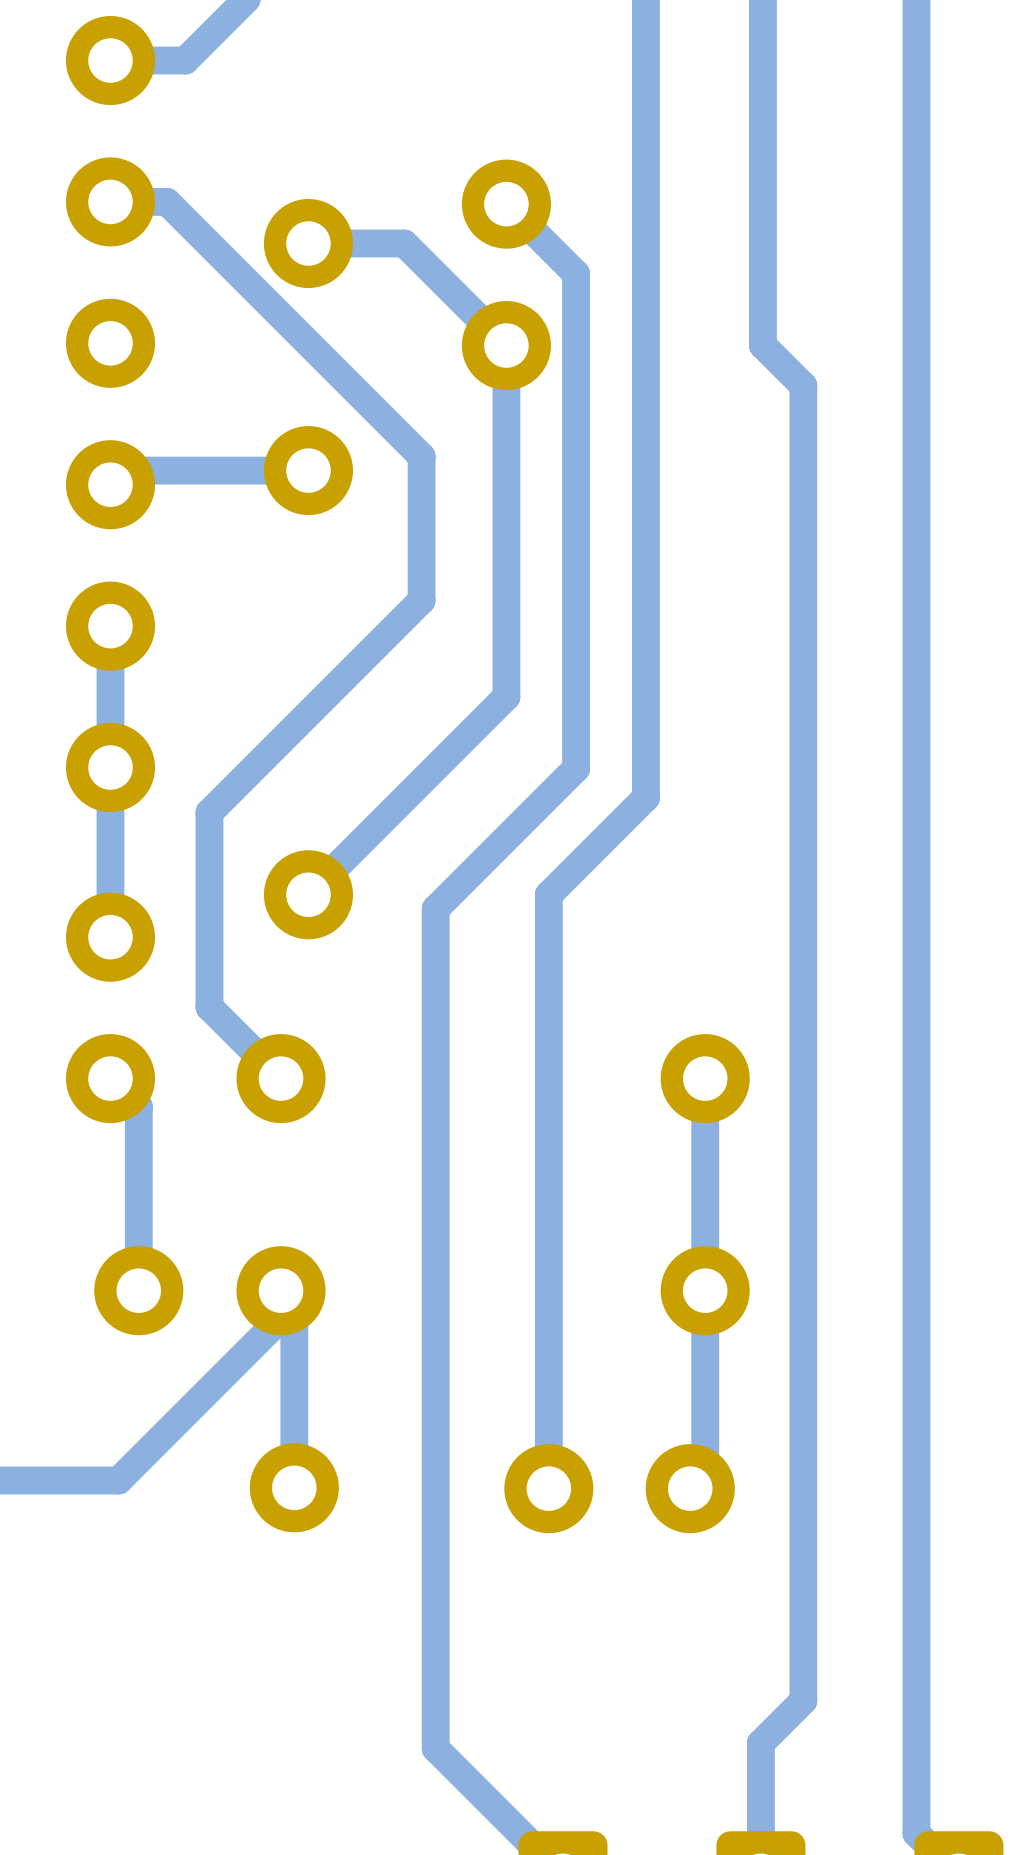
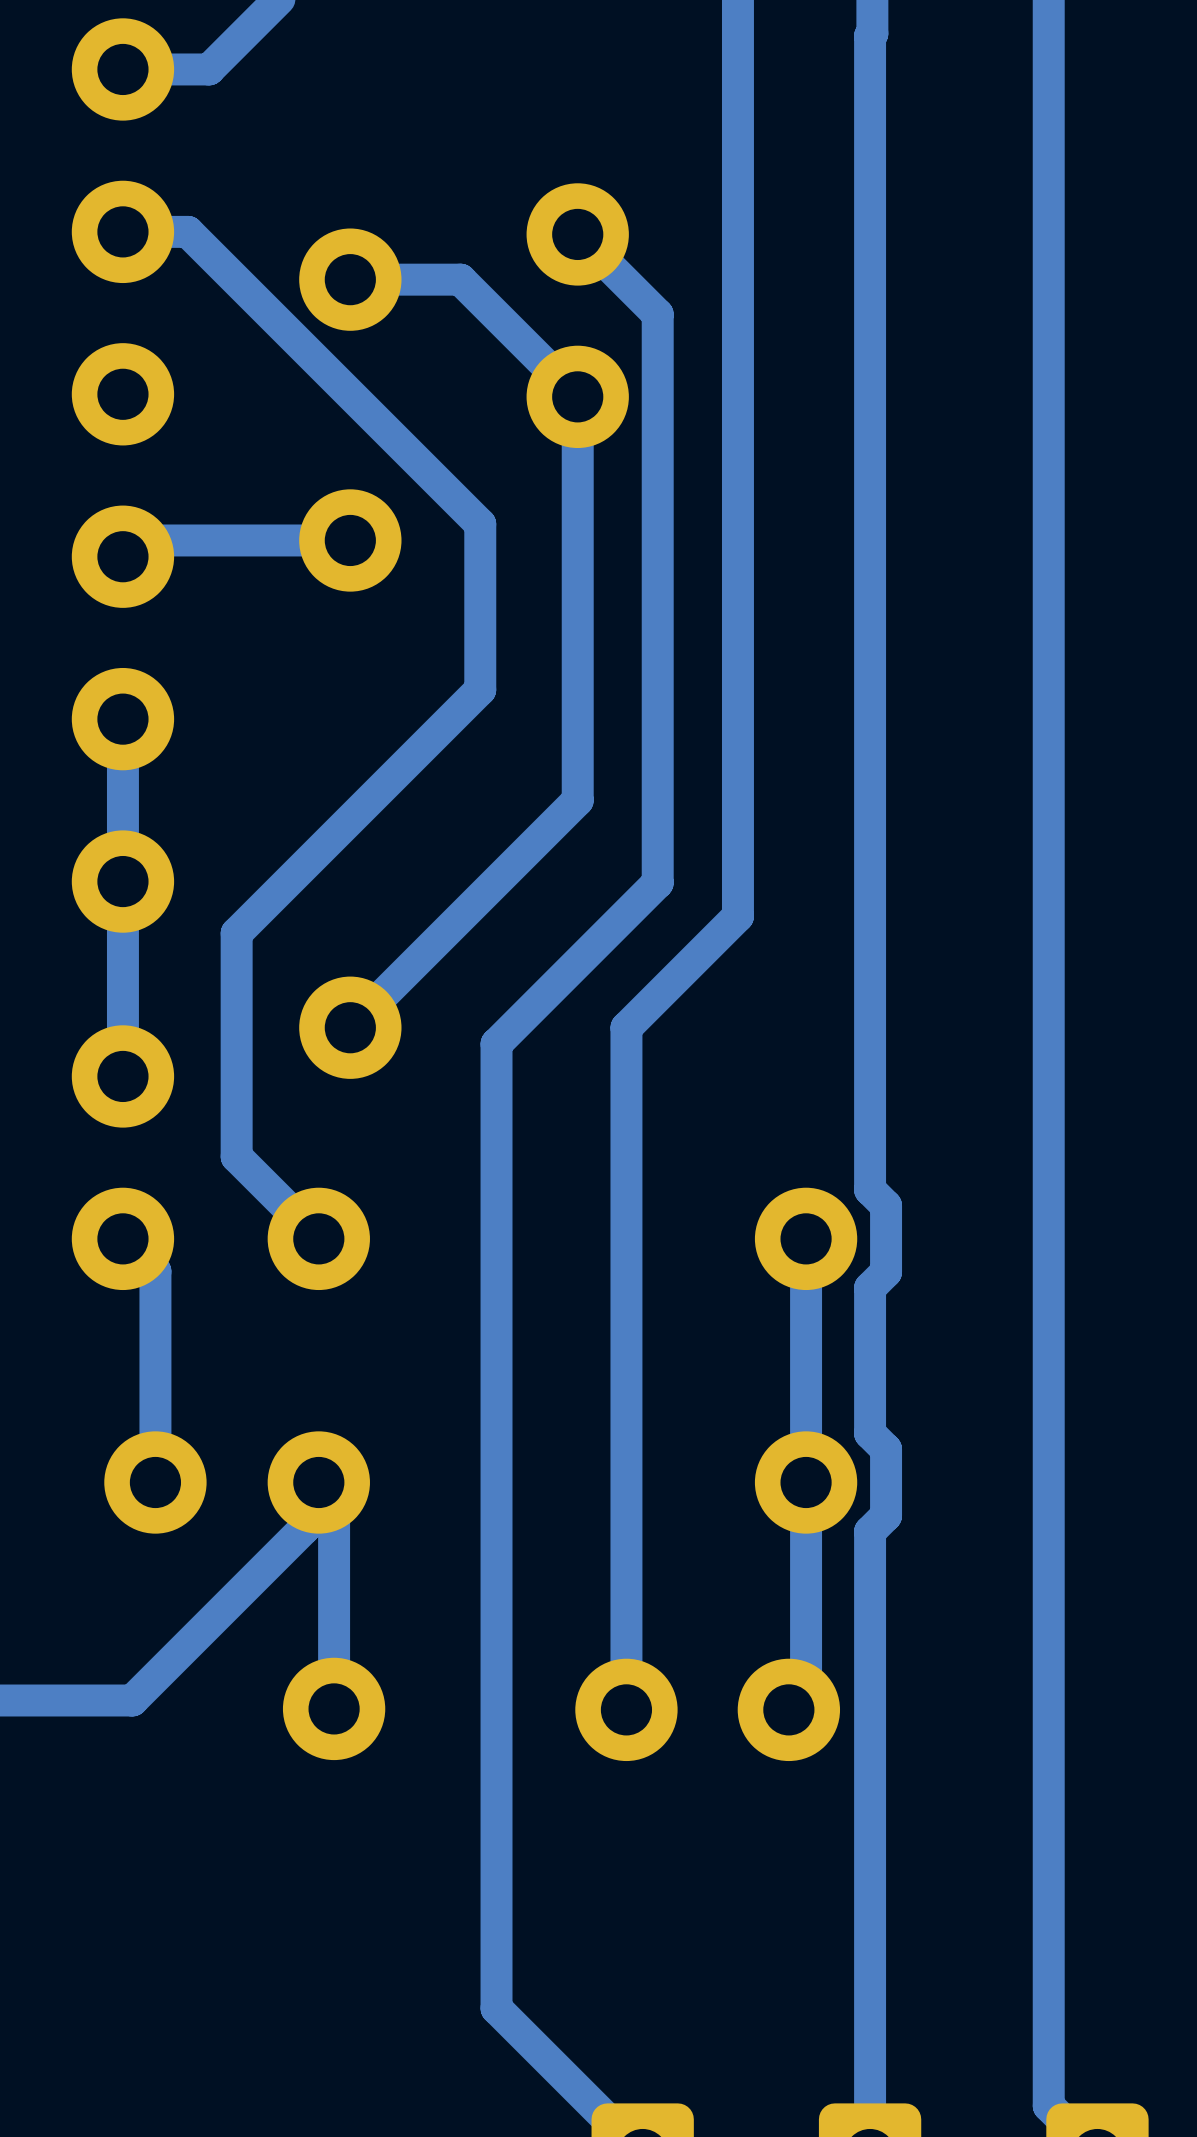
bottom track: (762, 29) (762, 345) (803, 385) (803, 1700) (760, 1743) -> (872, 33) (870, 35) (870, 1189) (886, 1205) (886, 1272) (870, 1287) (870, 1433) (886, 1449) (886, 1515) (870, 1531) (870, 2002)

